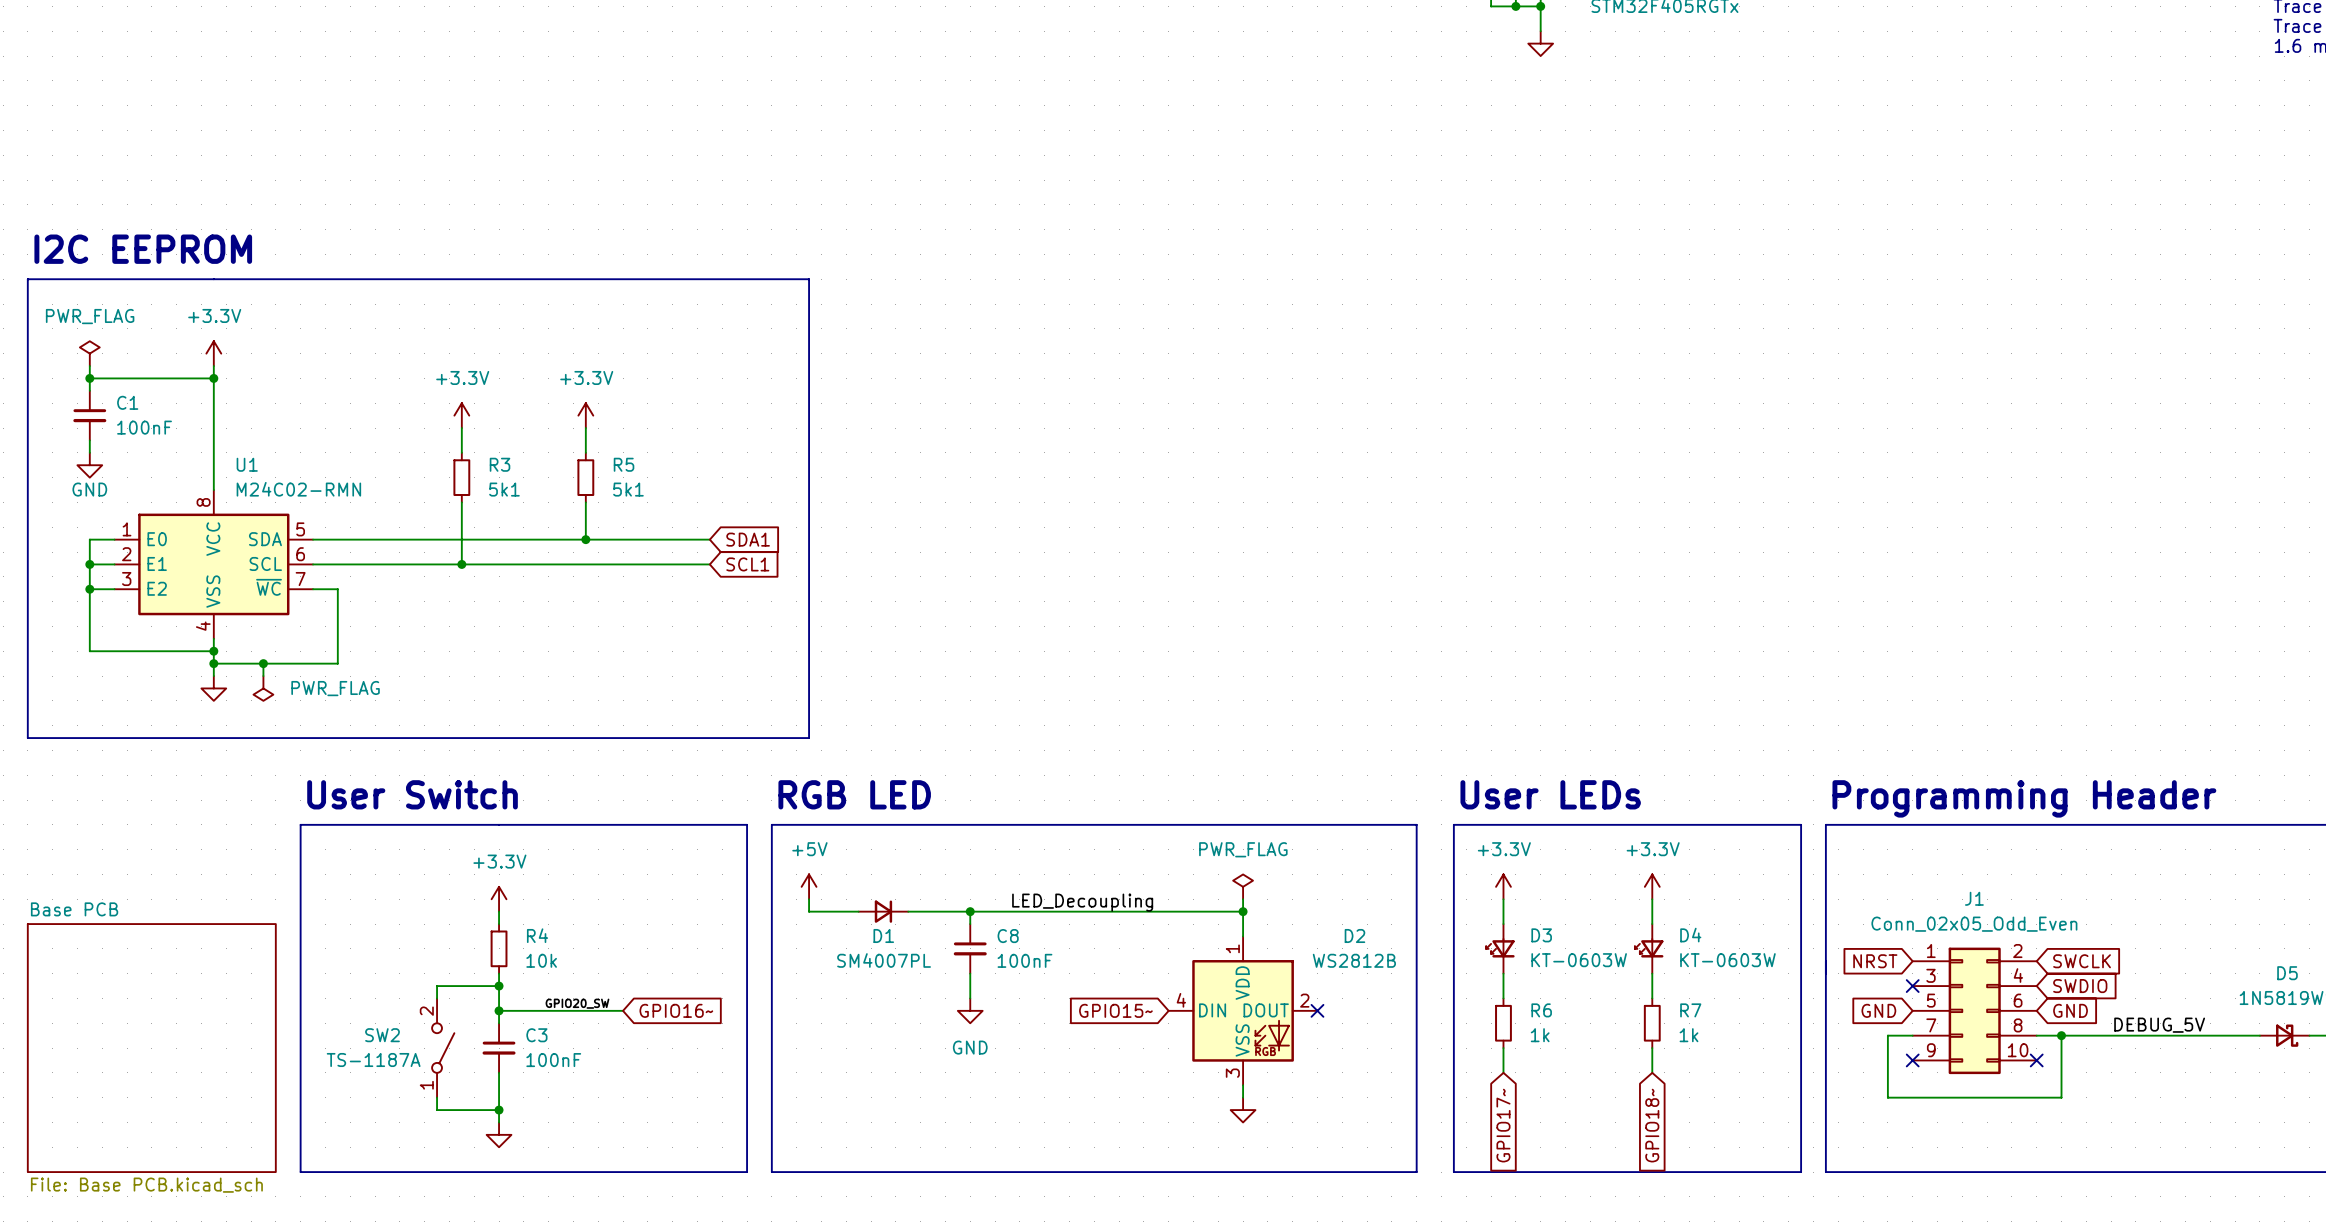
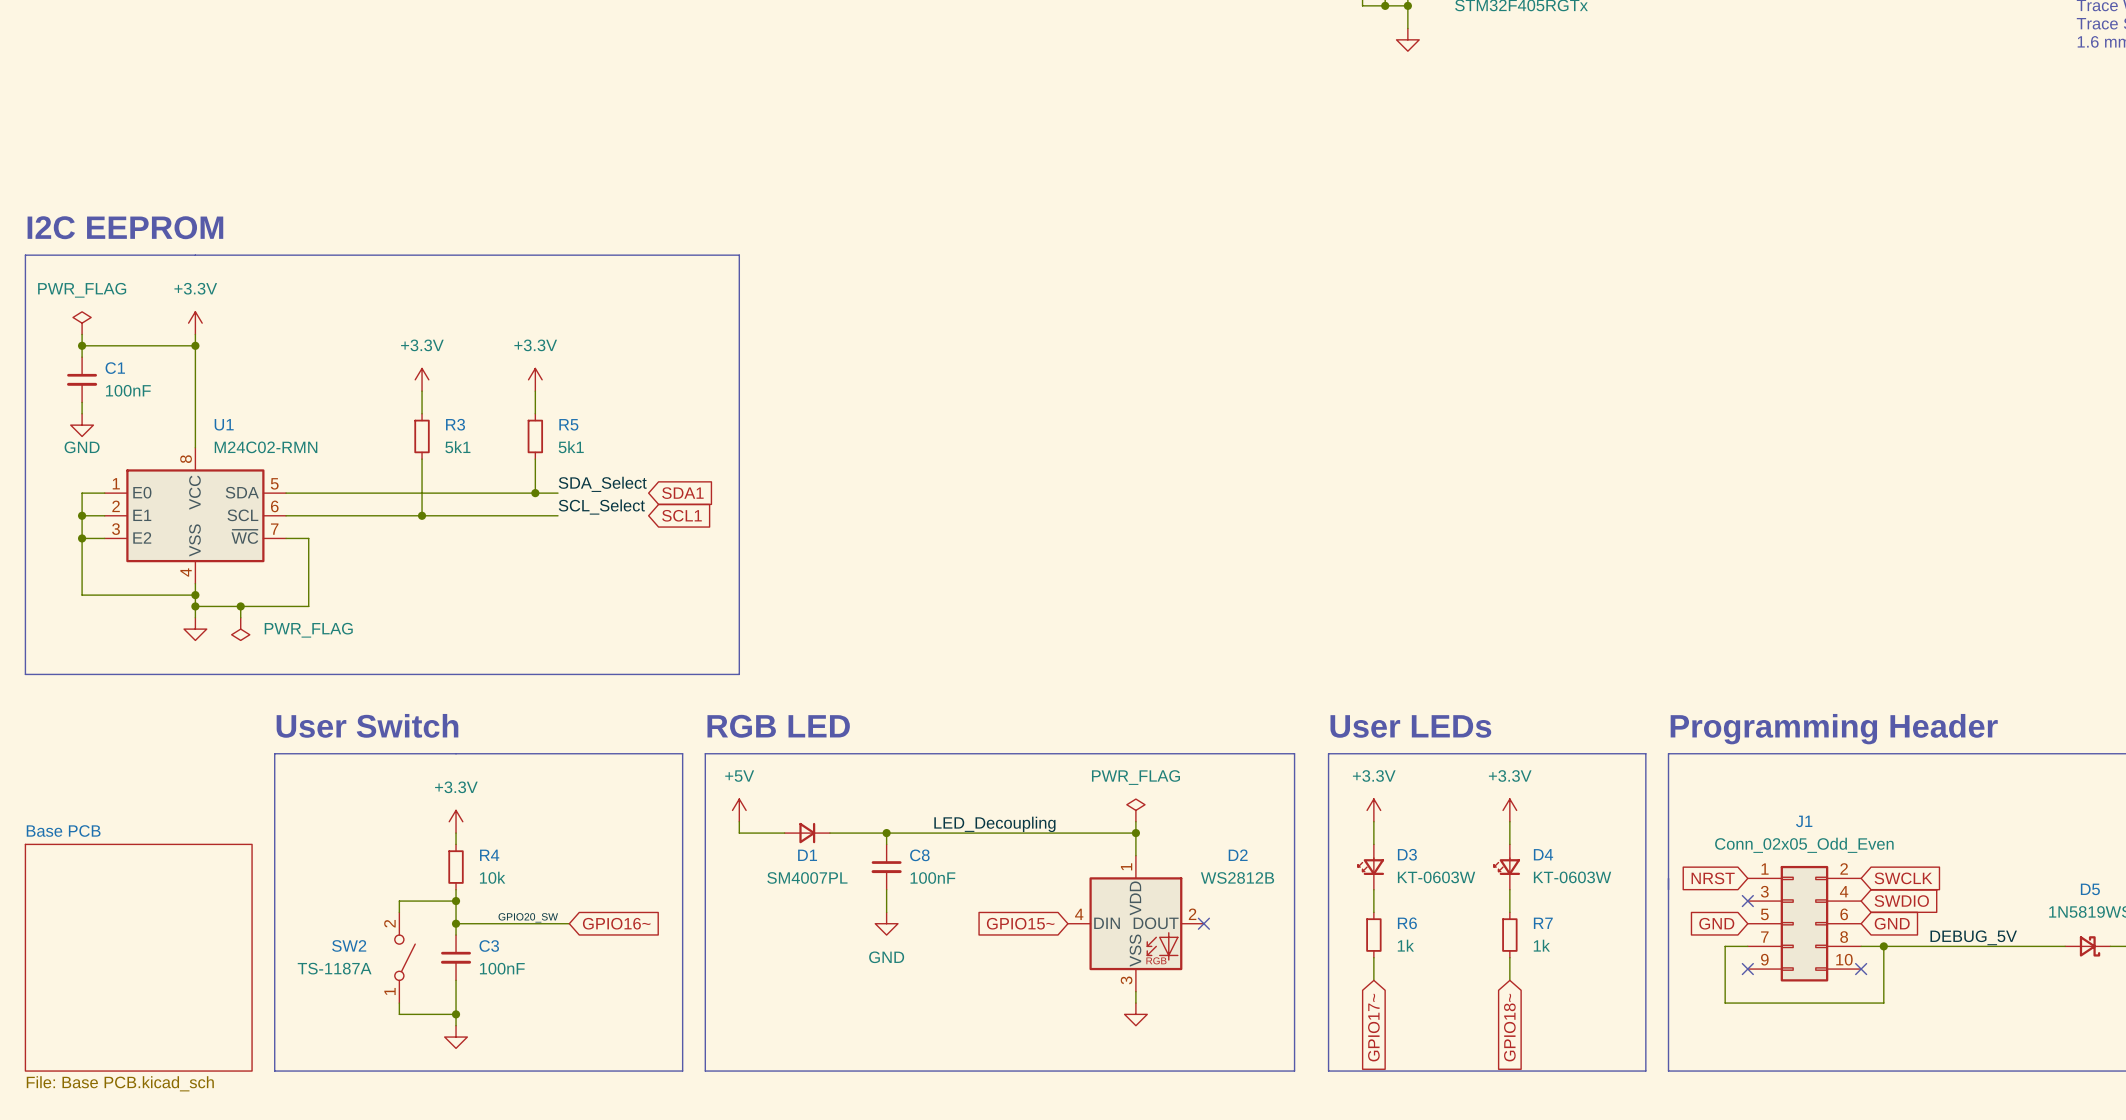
label: none -> SDA_Select (602, 484)
wire: (610, 539) (709, 539) -> none
label: none -> SCL_Select (601, 507)
wire: (610, 564) (709, 564) -> none

